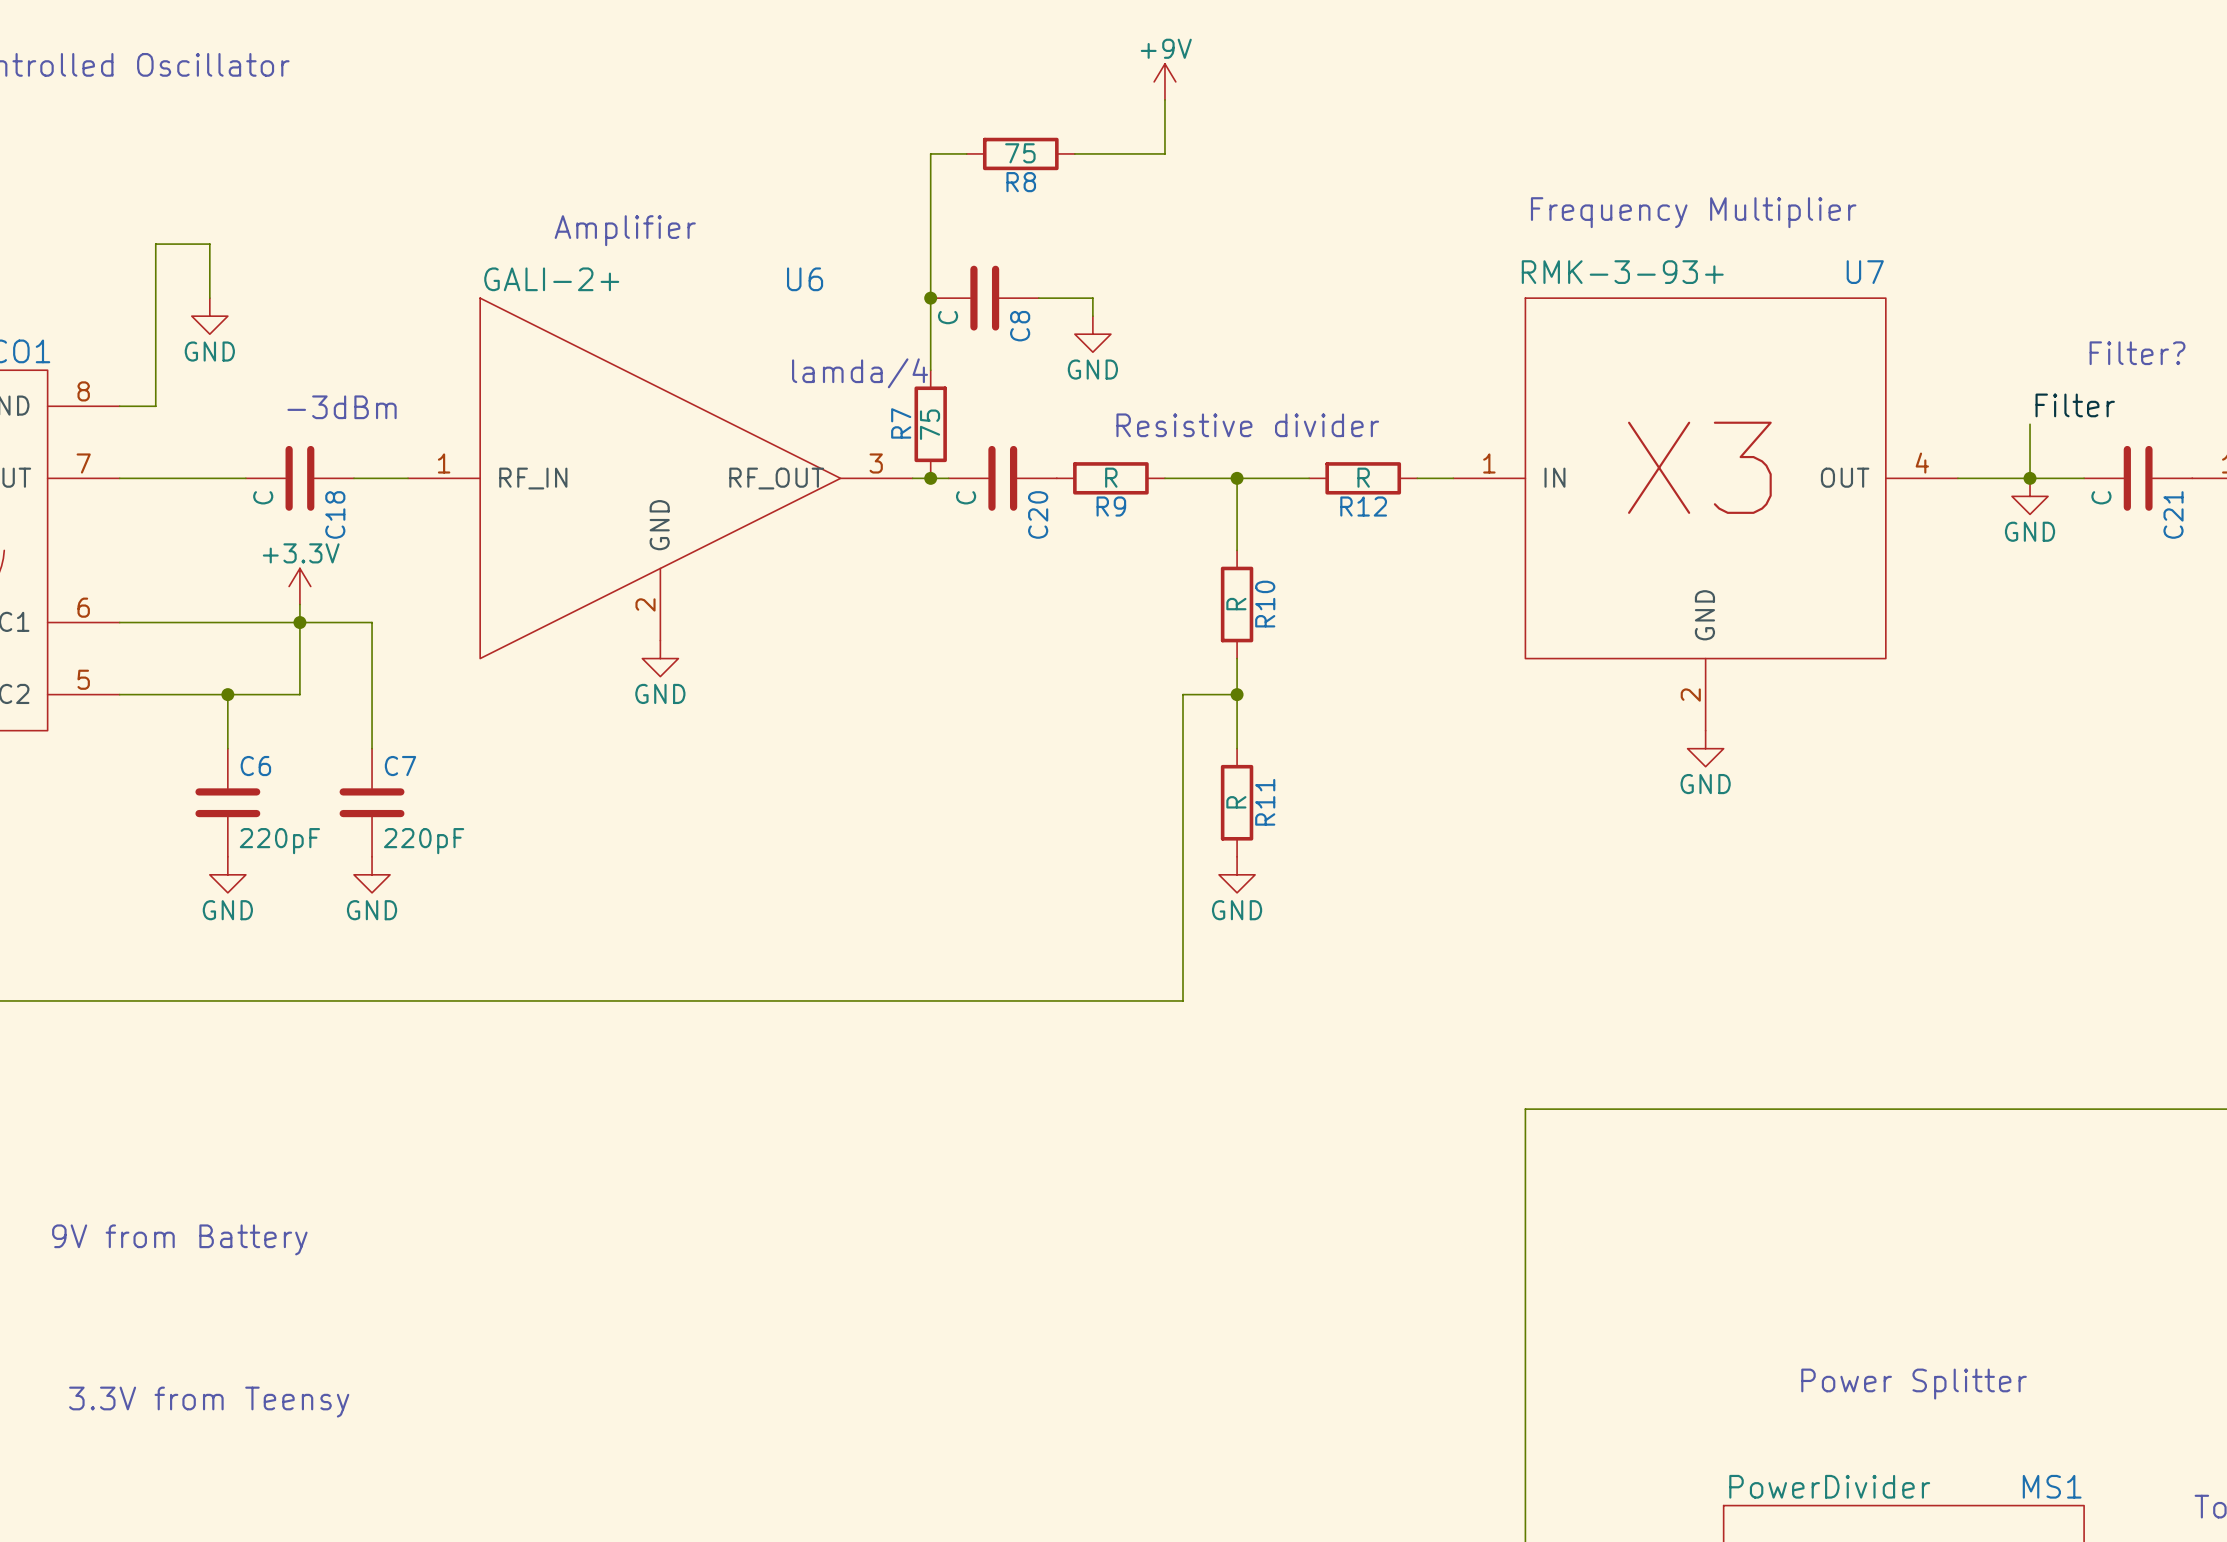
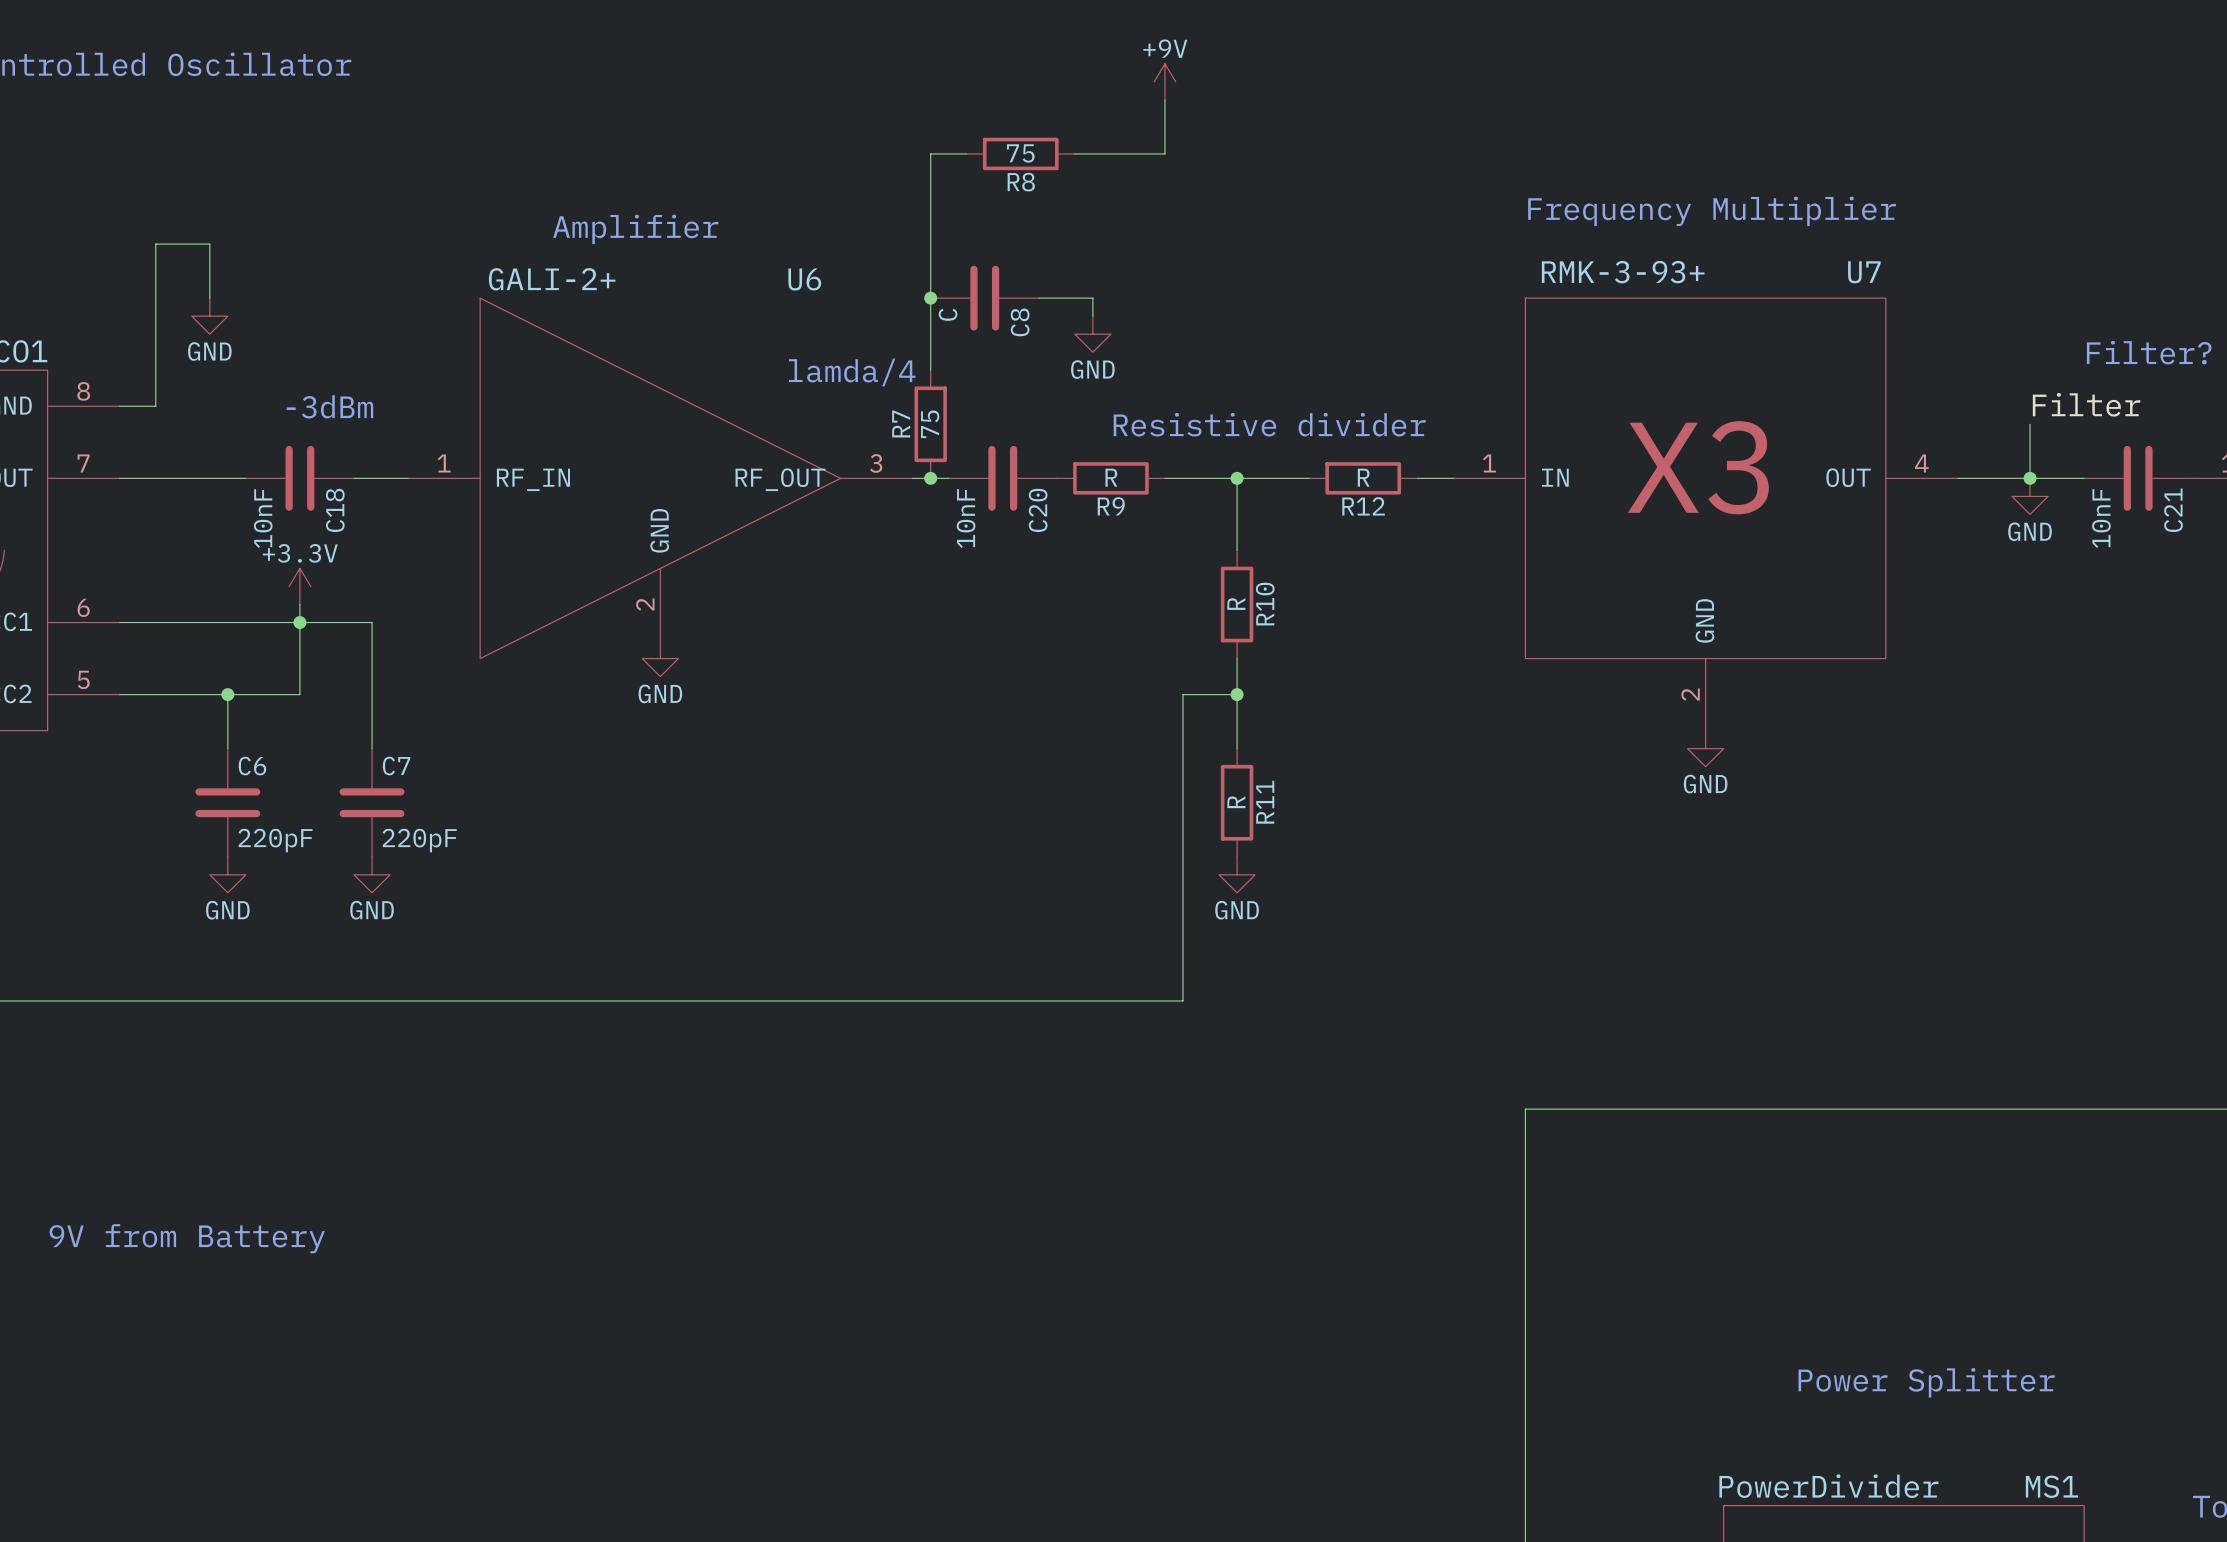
C18 value: C (263, 497) -> 10nF (263, 518)
C20 value: C (966, 497) -> 10nF (966, 518)
C21 value: C (2101, 497) -> 10nF (2101, 518)
text: 3.3V from Teensy (209, 1402) -> none

